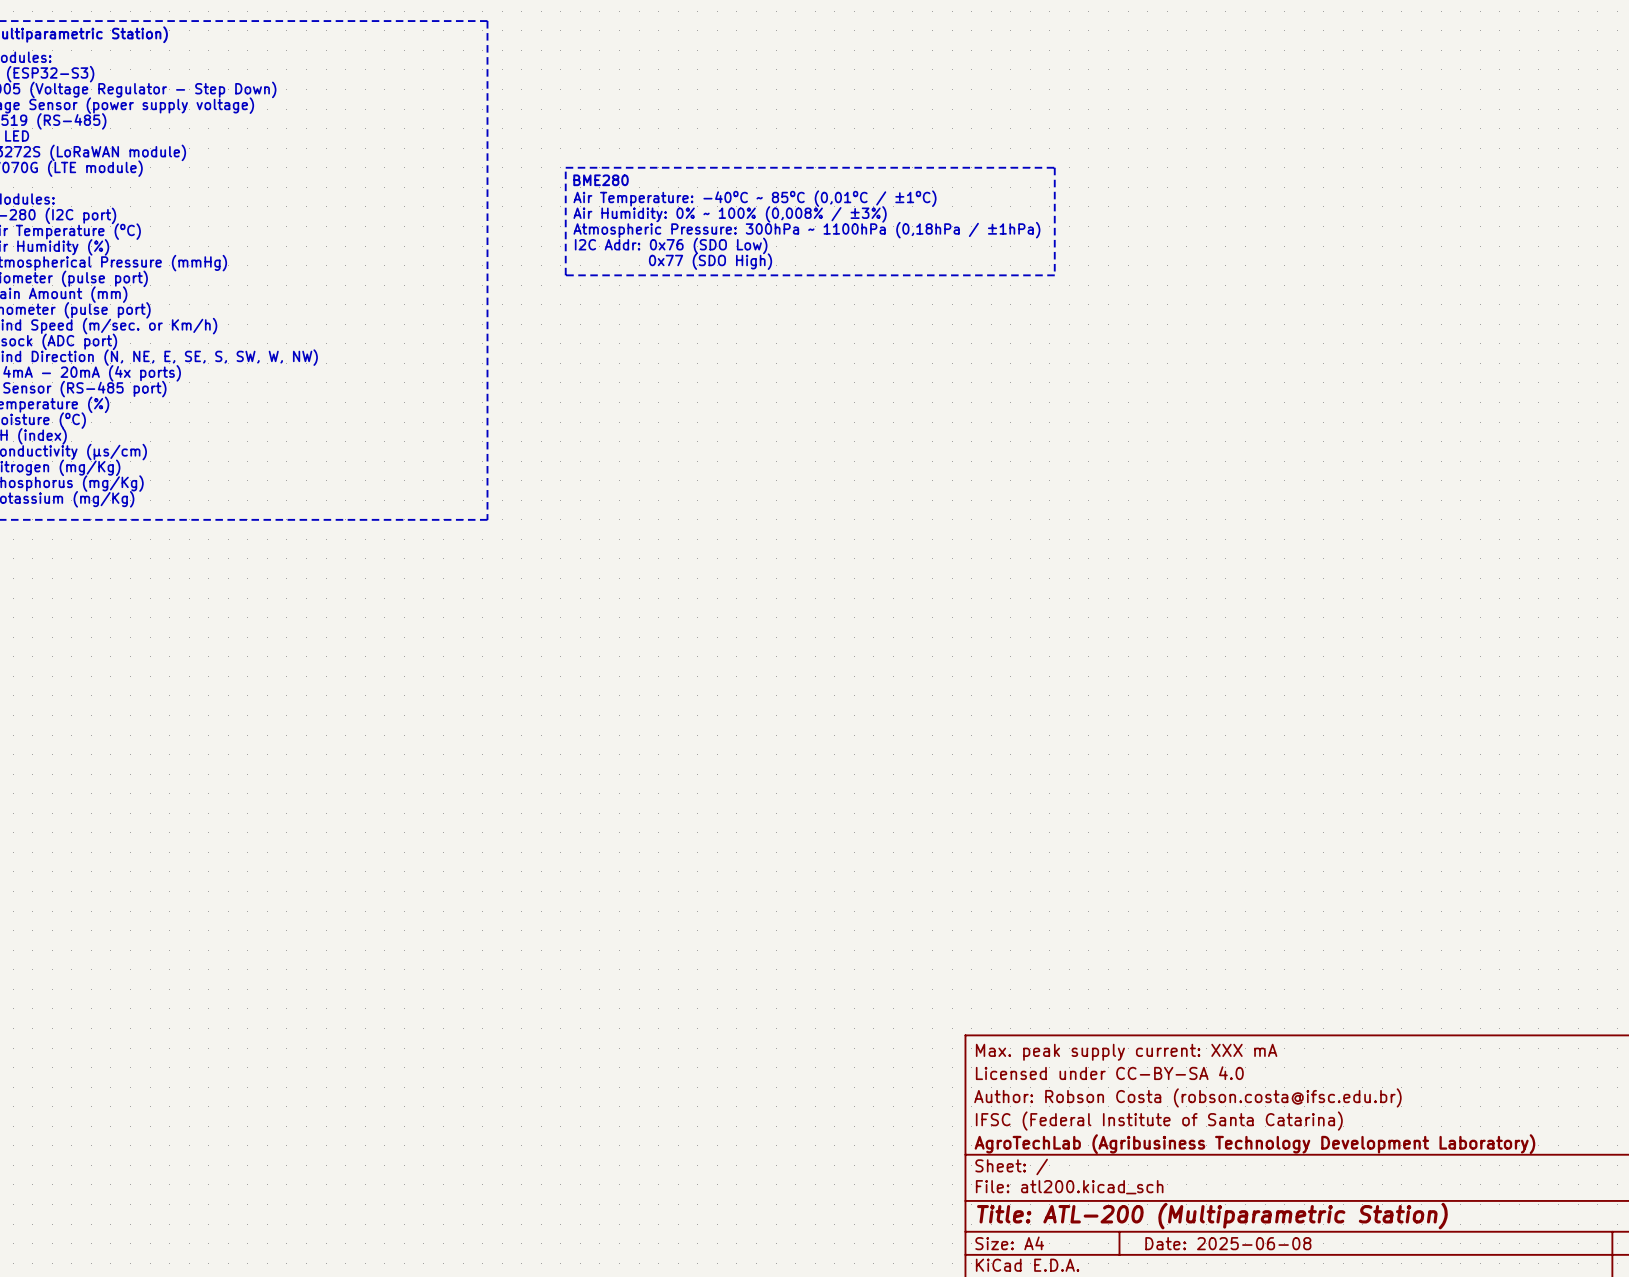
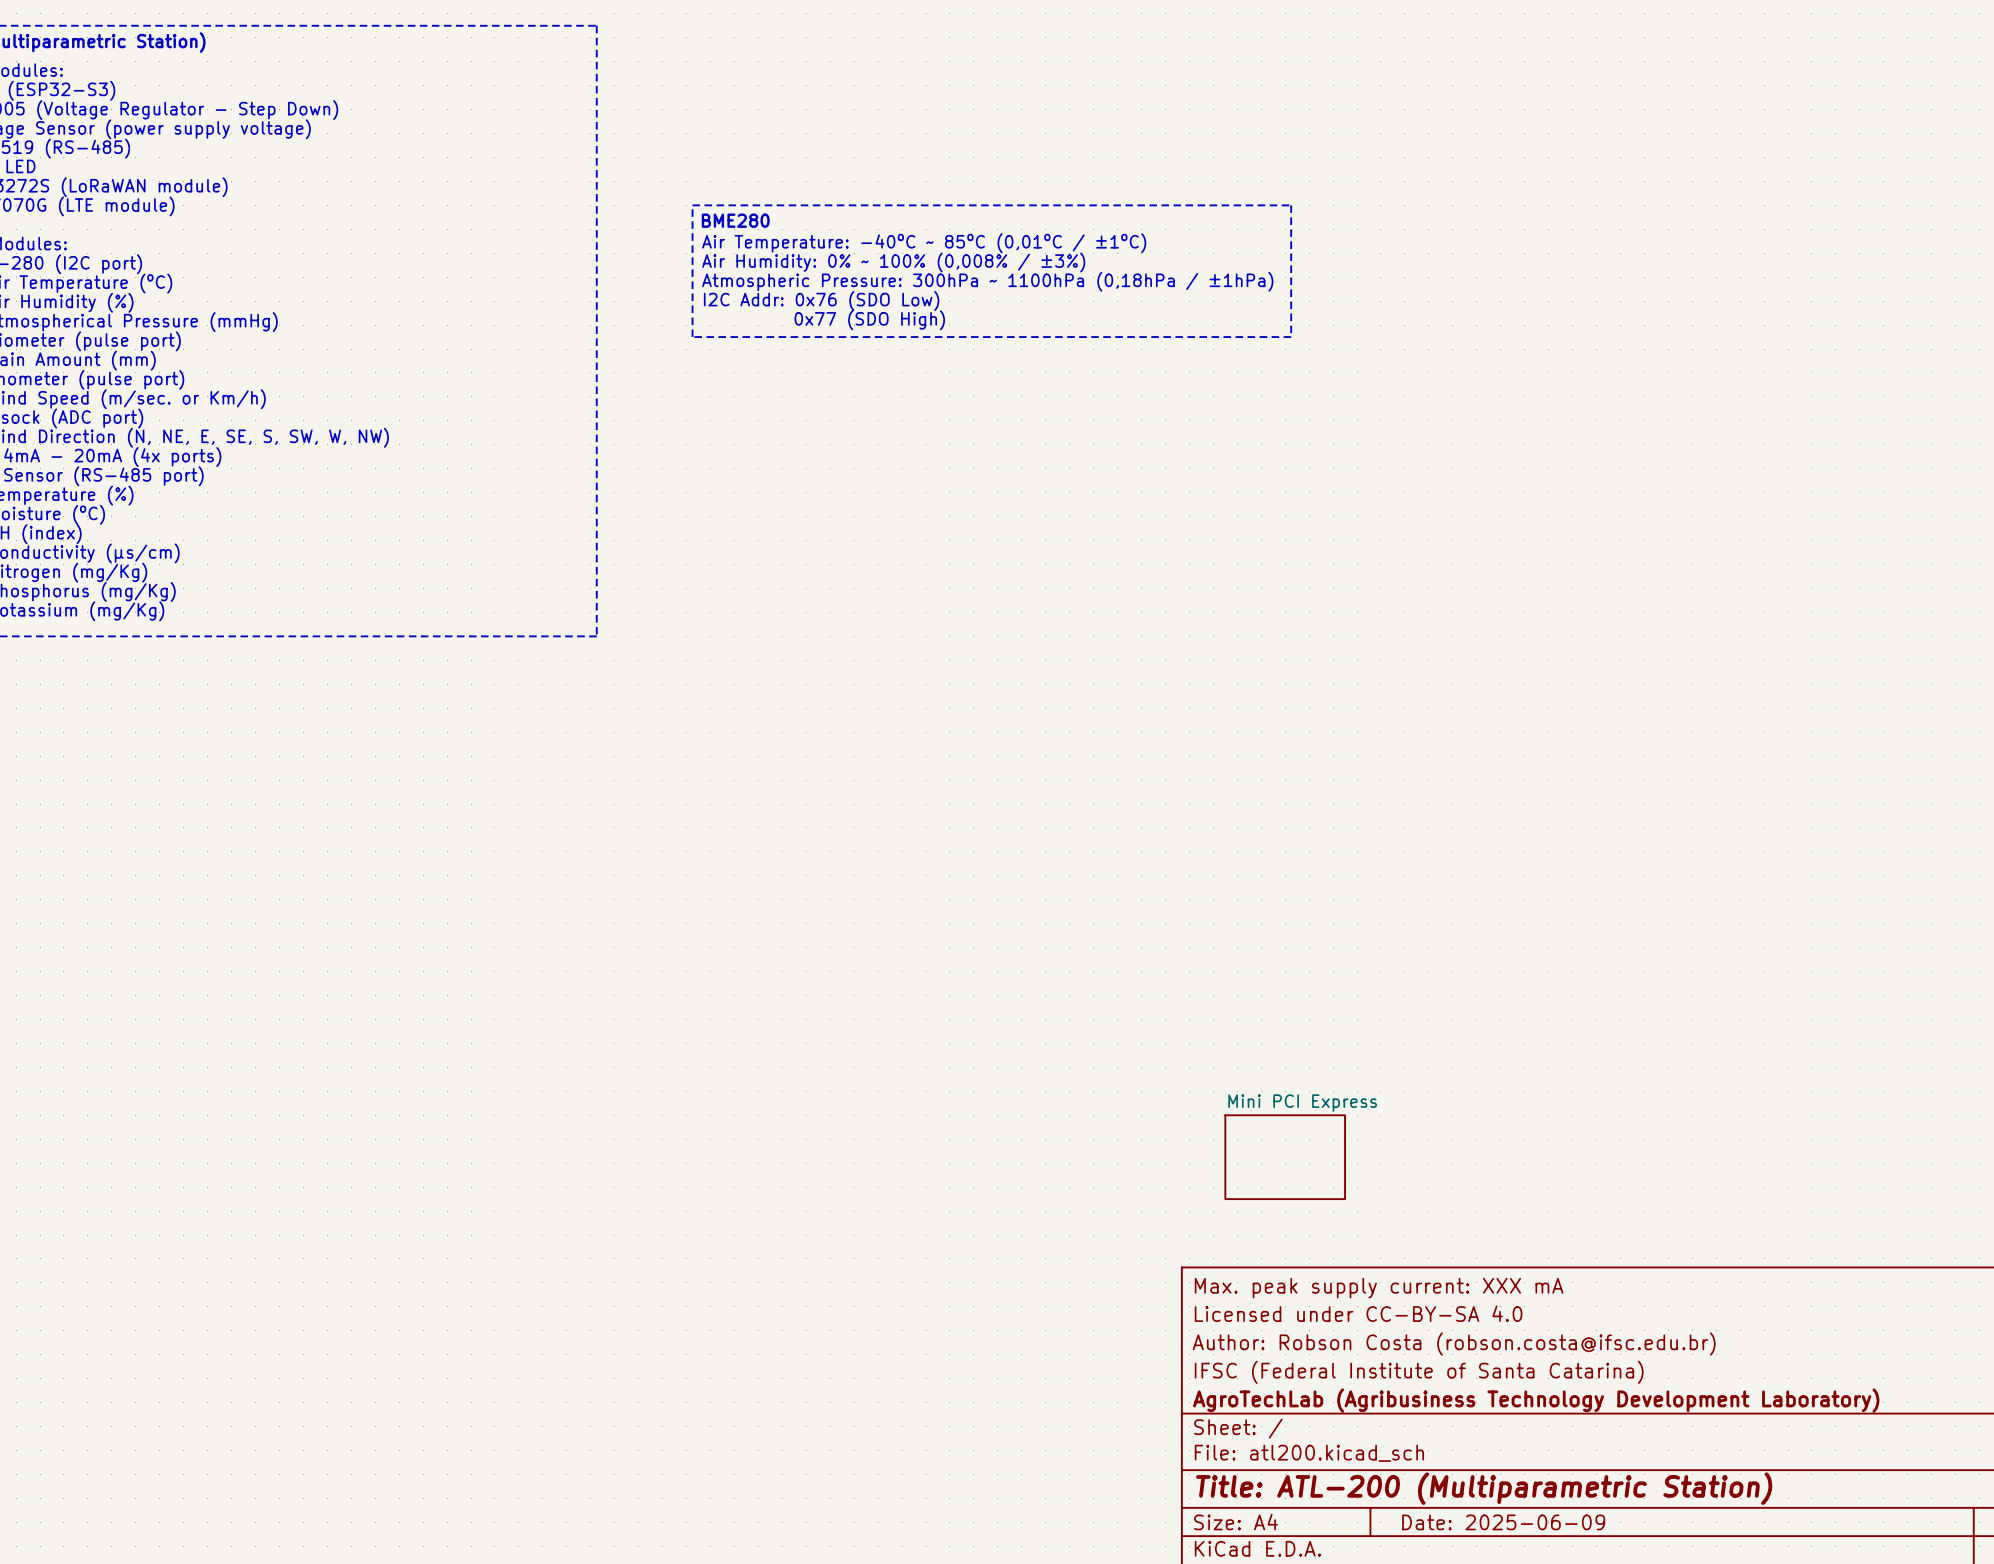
sheet Mini PCI Express: none -> (1285, 1157)
title block: Date: 2025-06-08 (1228, 1243) -> Date: 2025-06-09 (1503, 1522)

